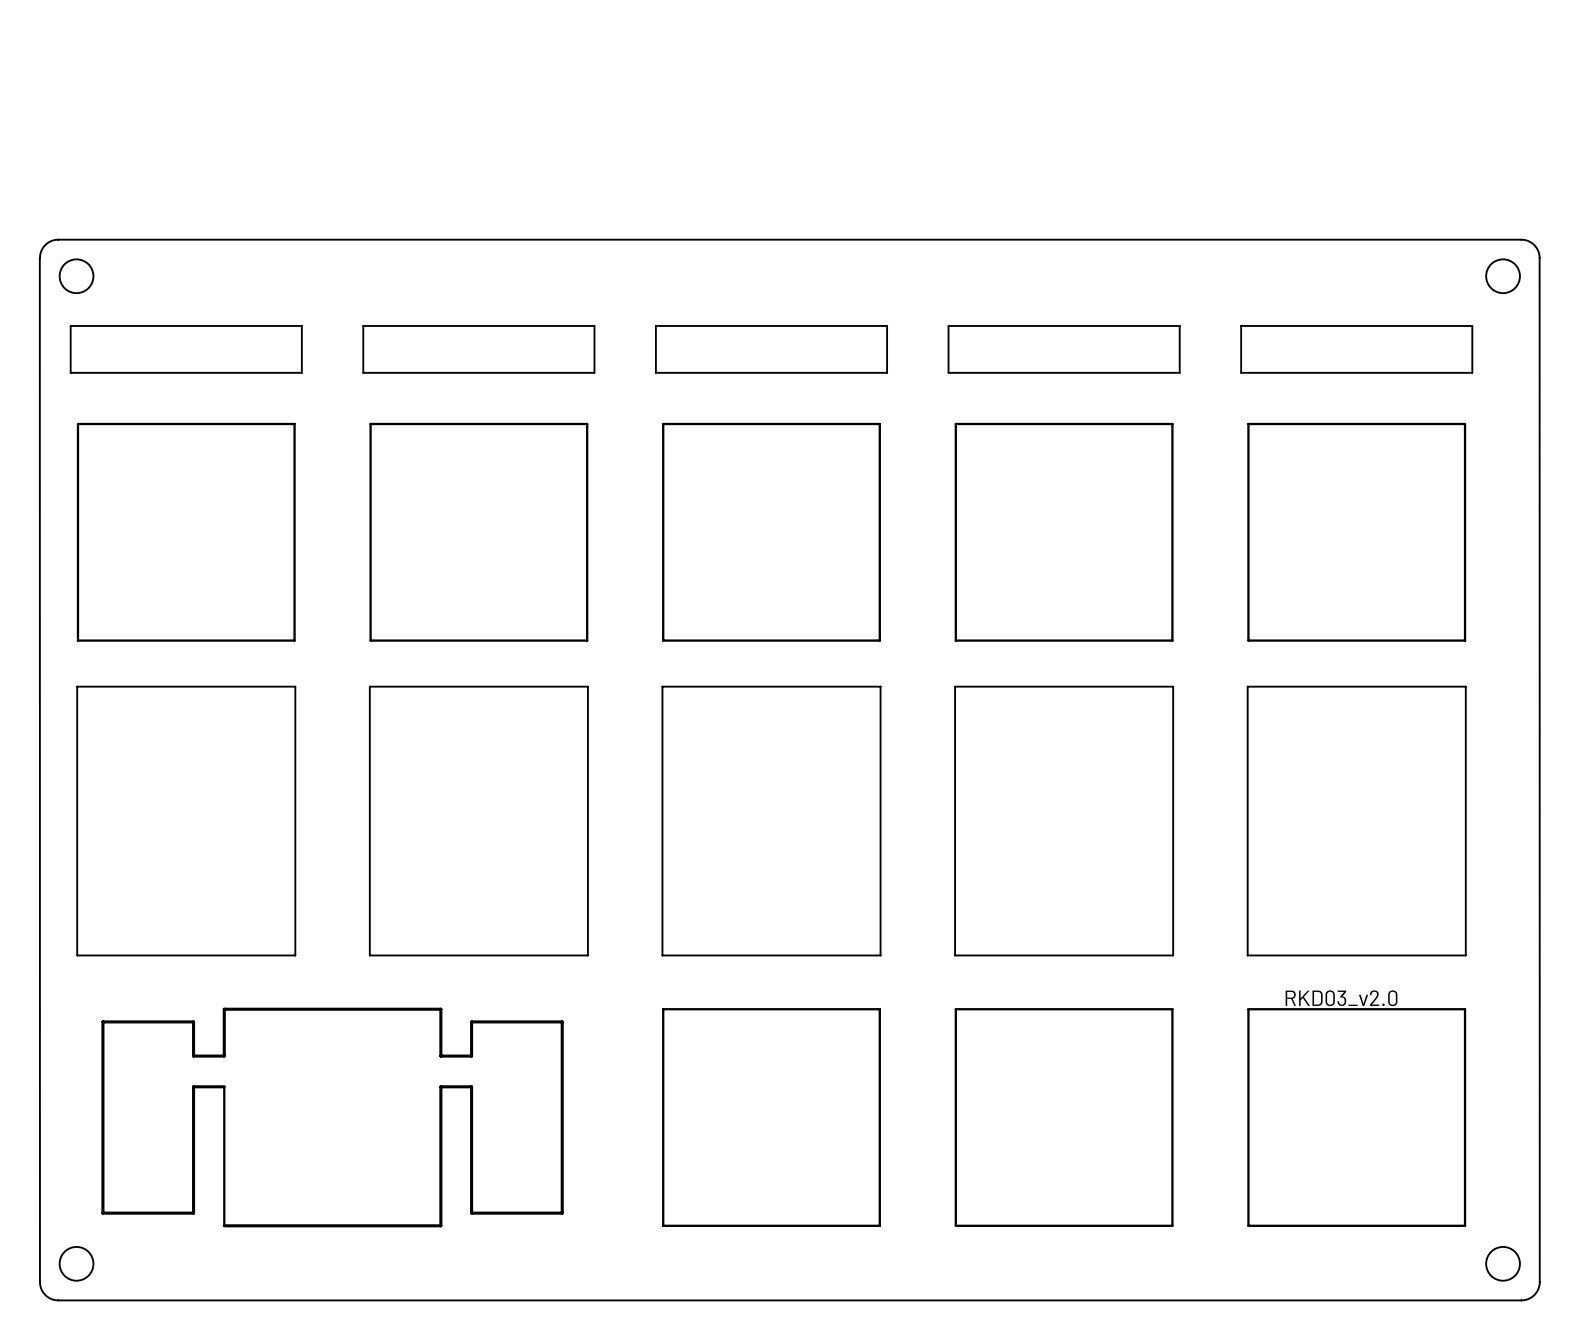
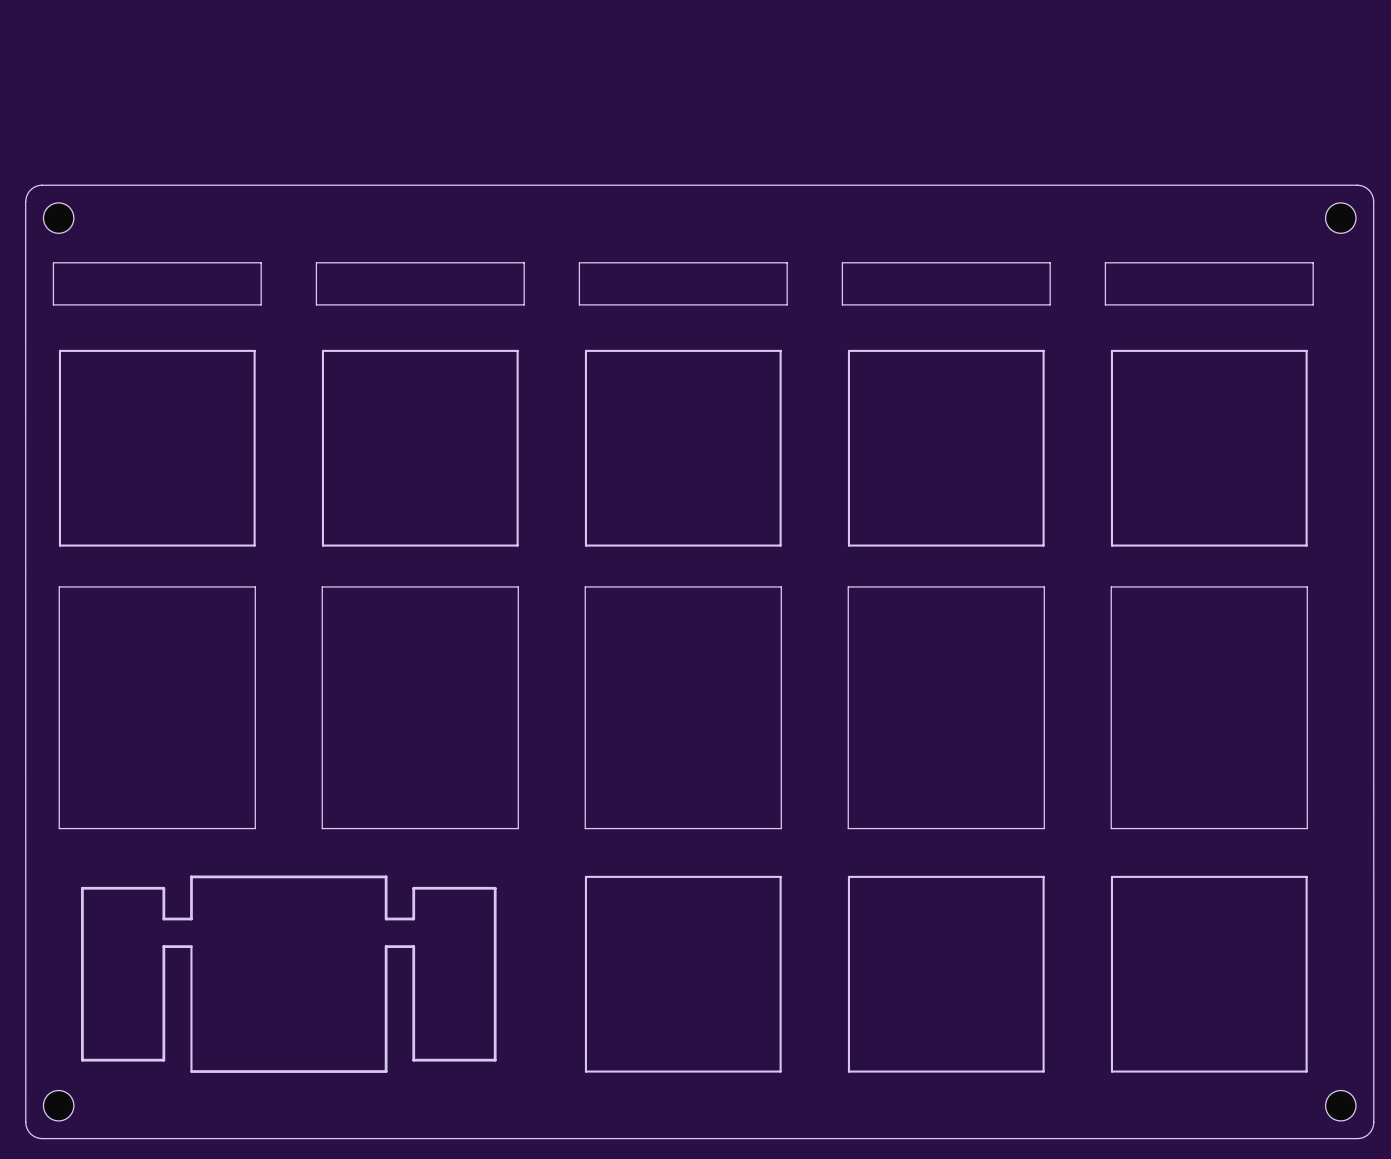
text: RKD03_v2.0 (1341, 998) -> none

